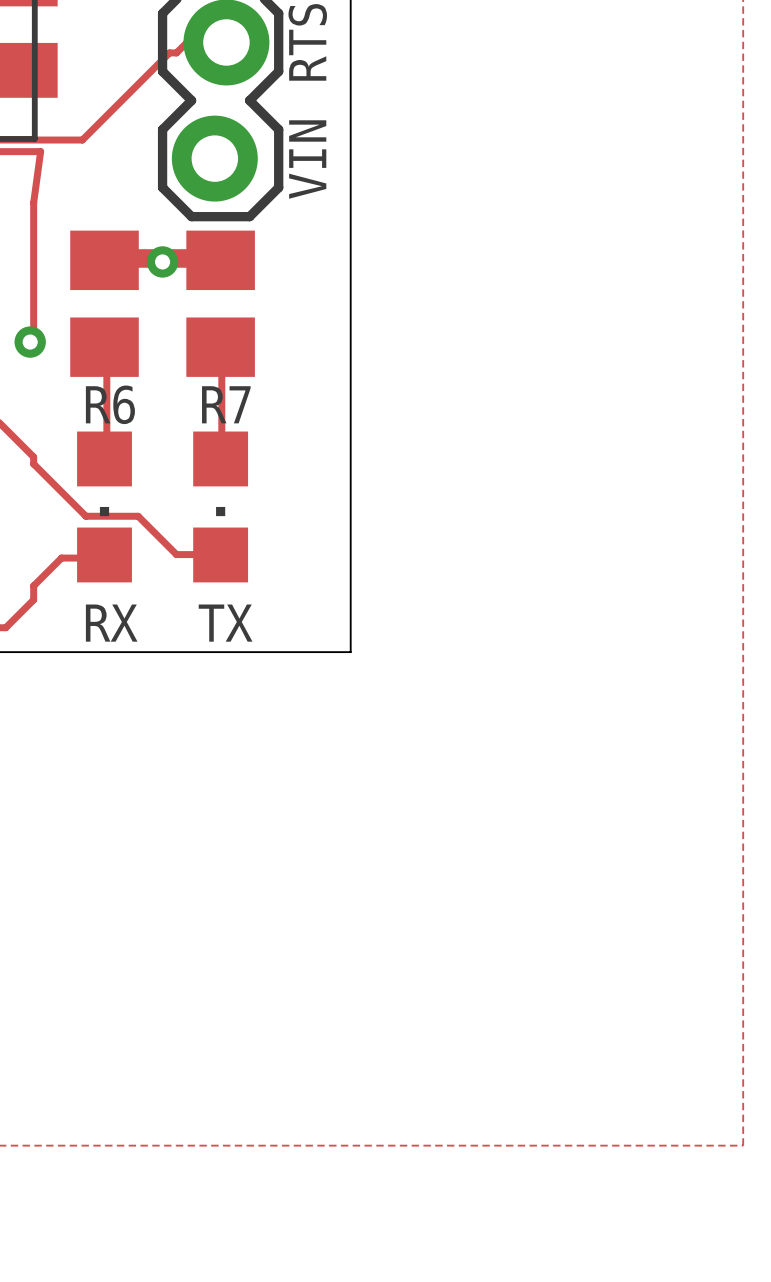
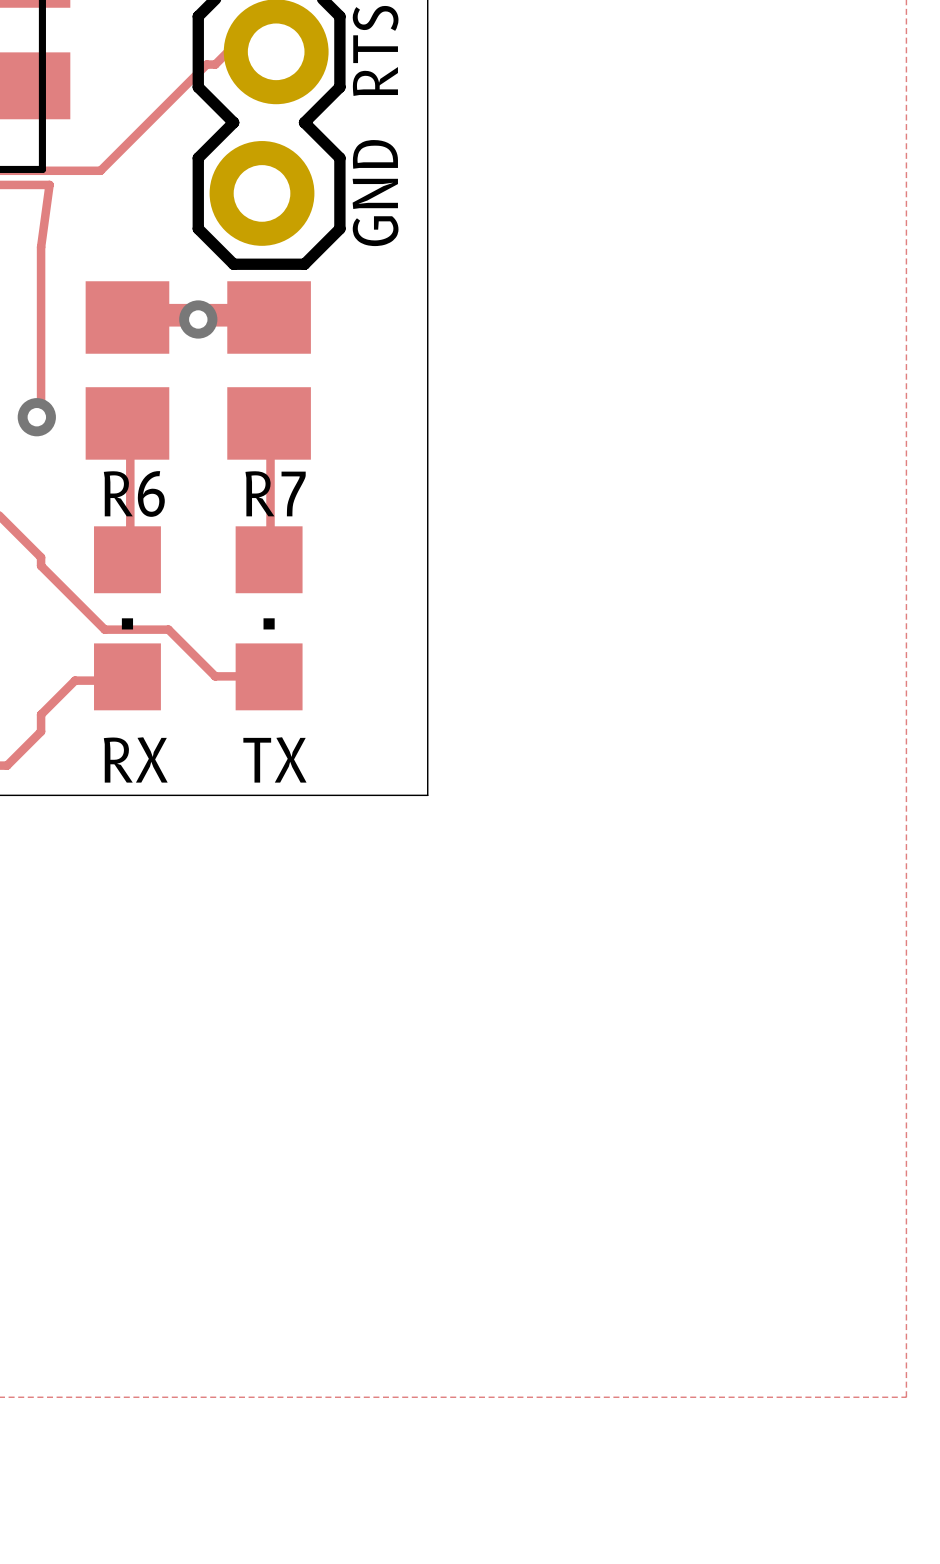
text: VIN (307, 159) -> GND (375, 193)

